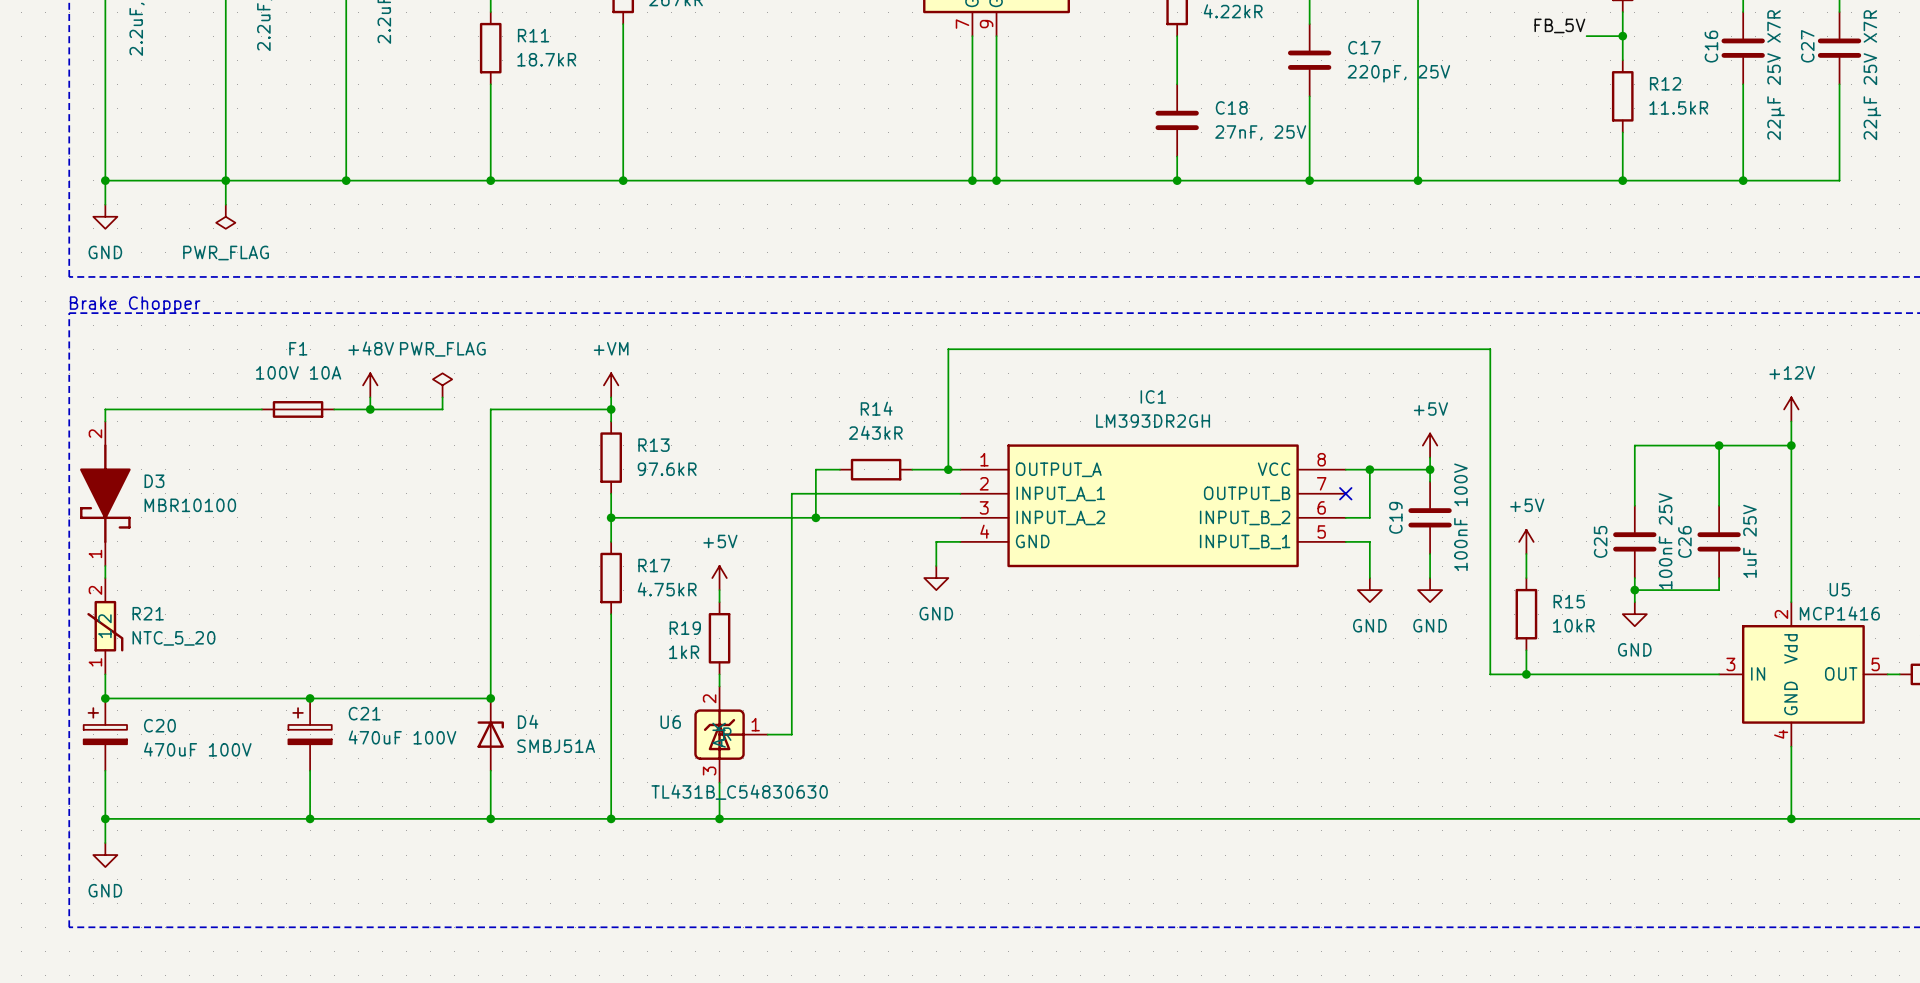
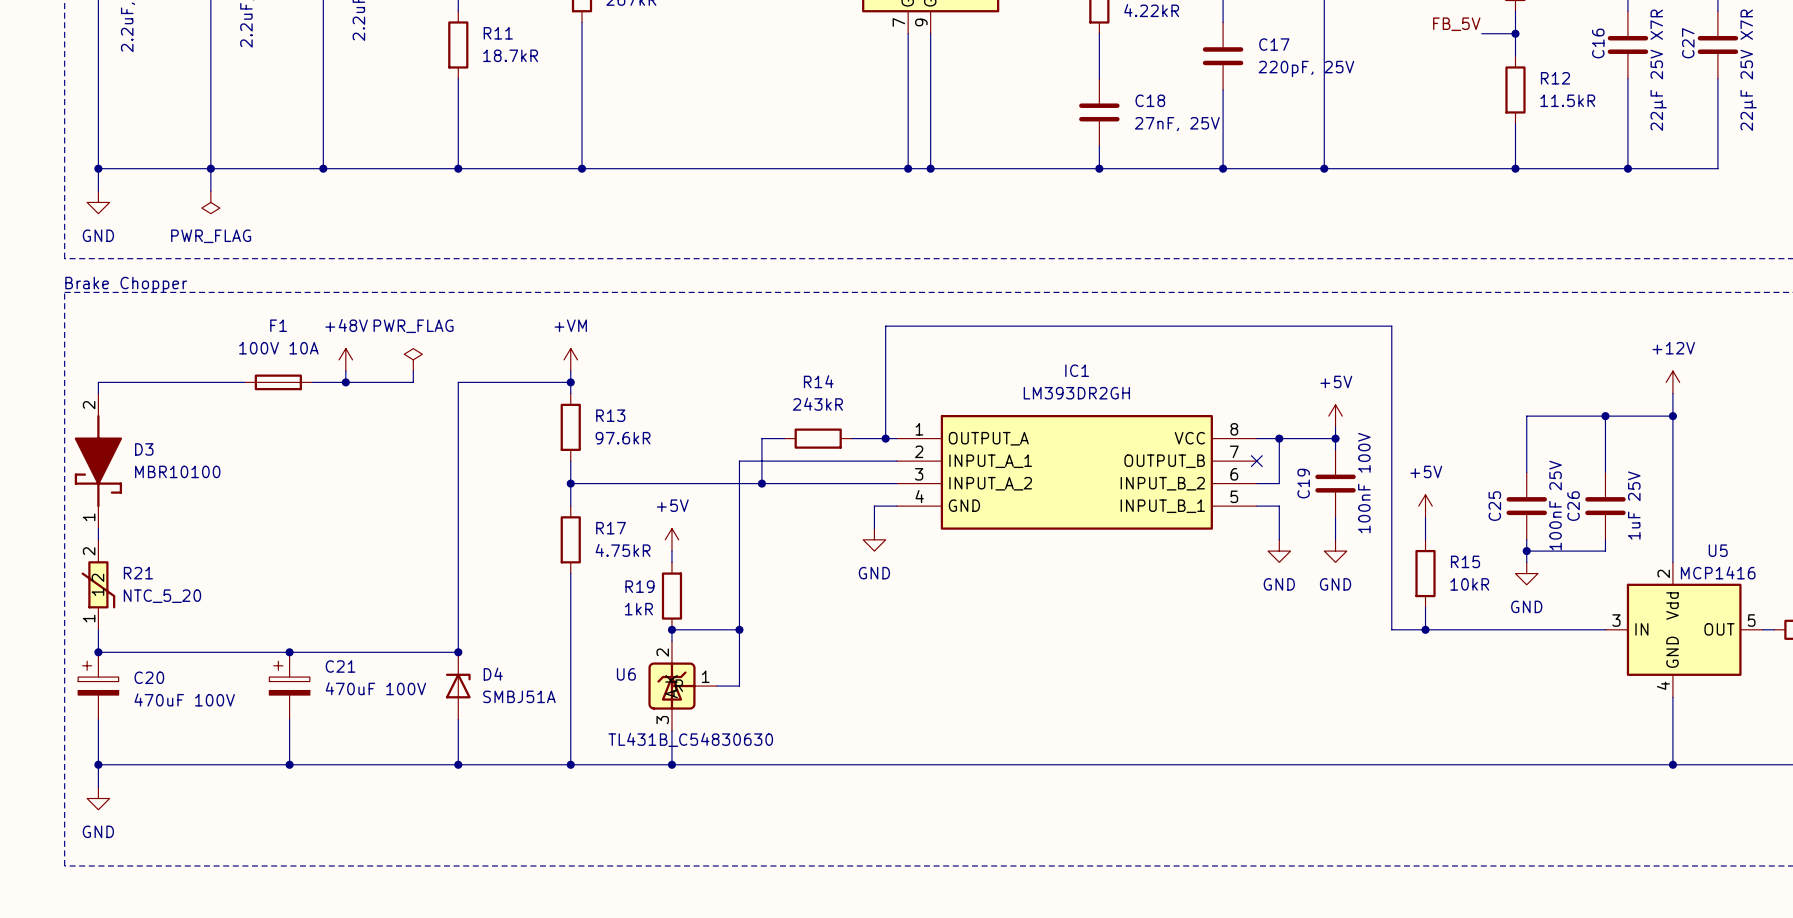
wire: none -> (671, 629) (739, 629)
junction: none -> (671, 629)
junction: none -> (739, 629)

